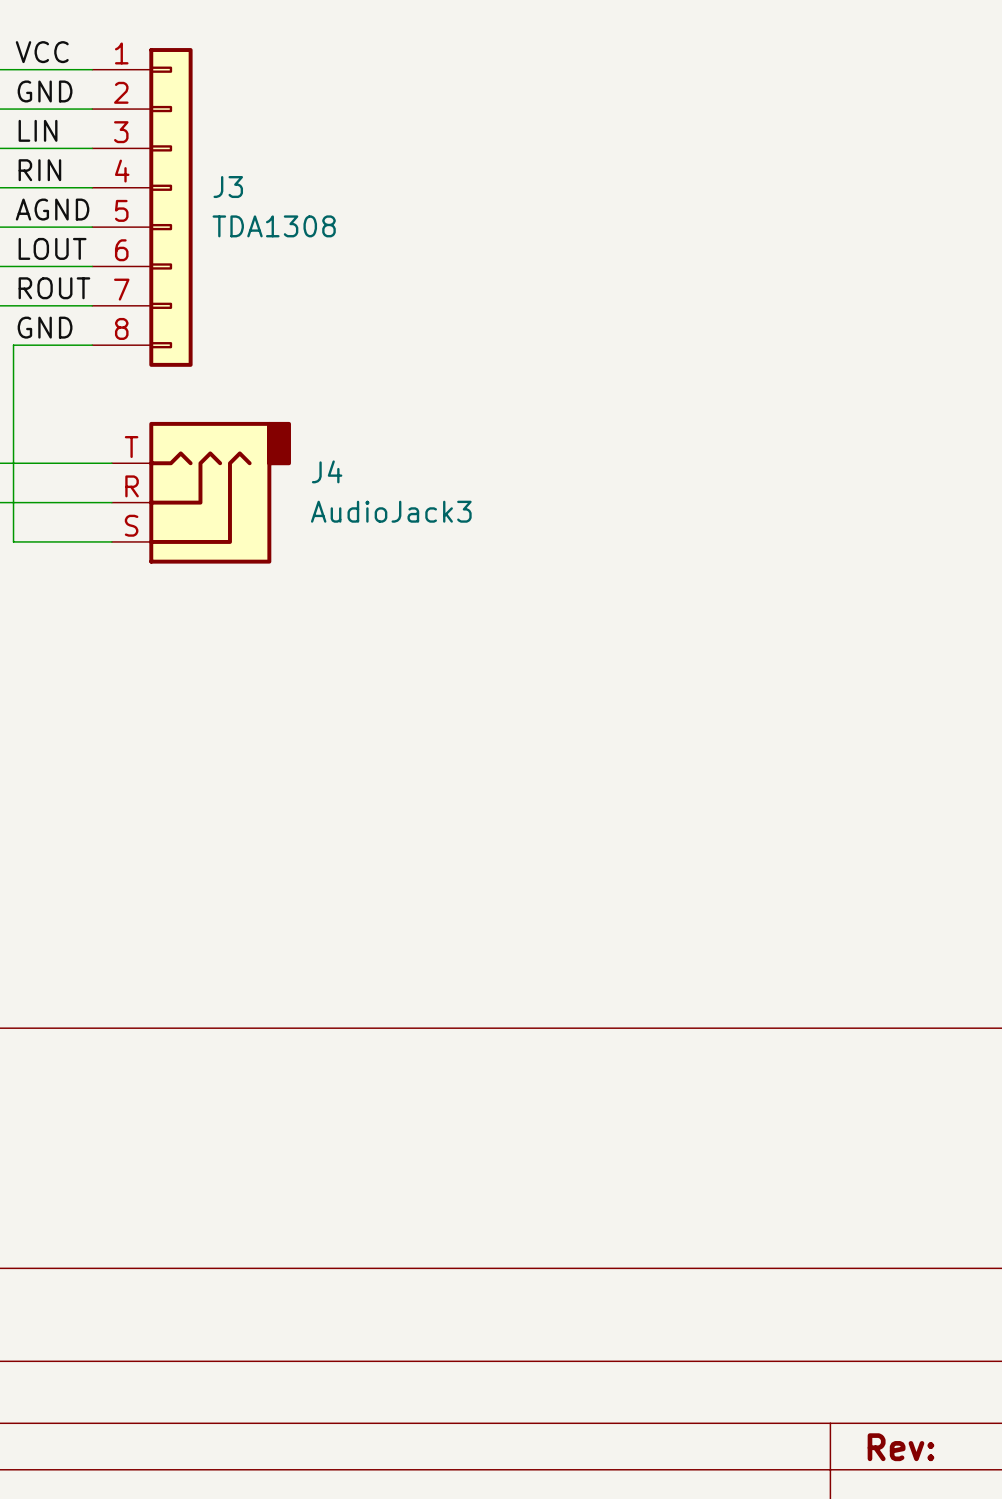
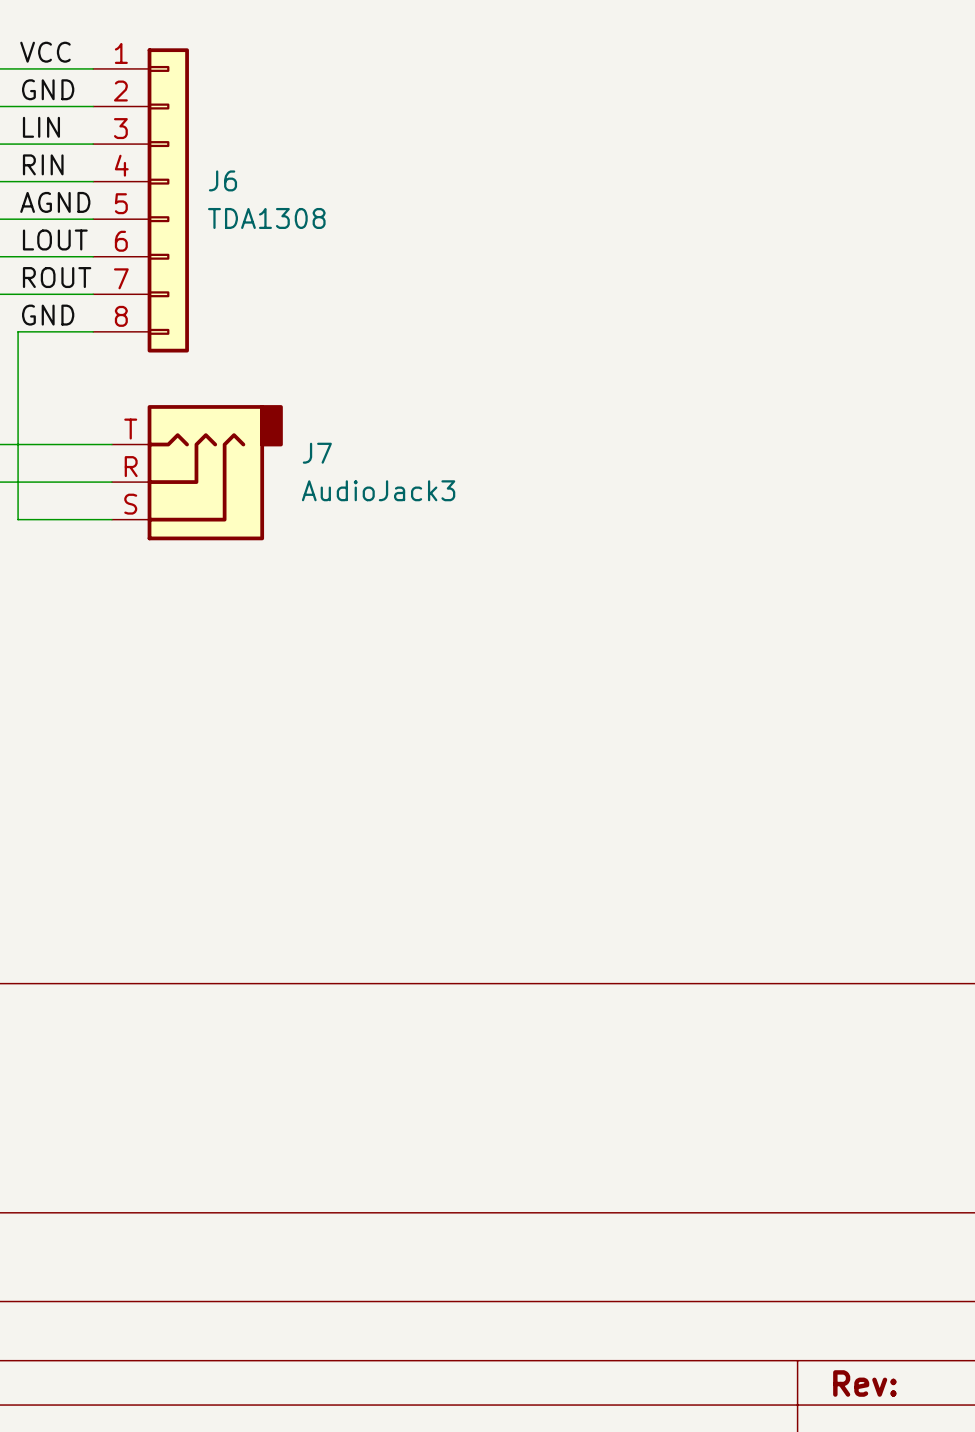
J3 name: J3 (228, 187) -> J6 (222, 180)
J4 name: J4 (327, 471) -> J7 (317, 453)

